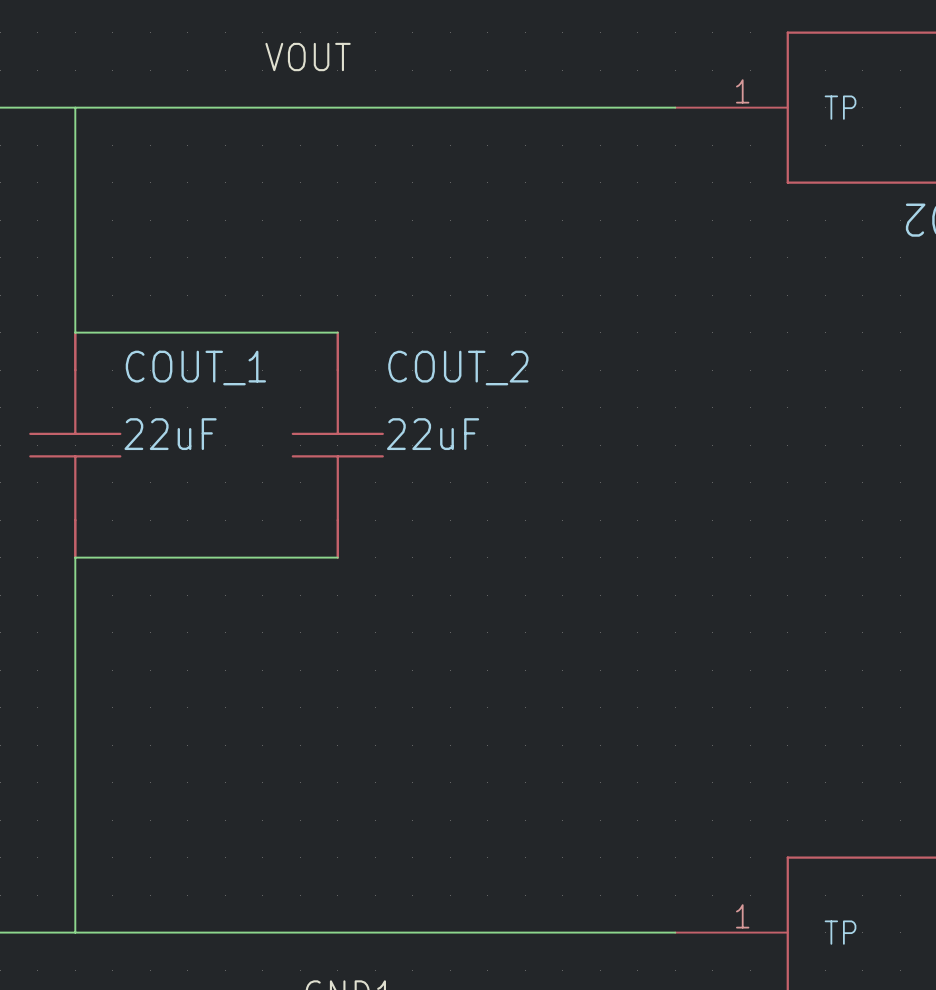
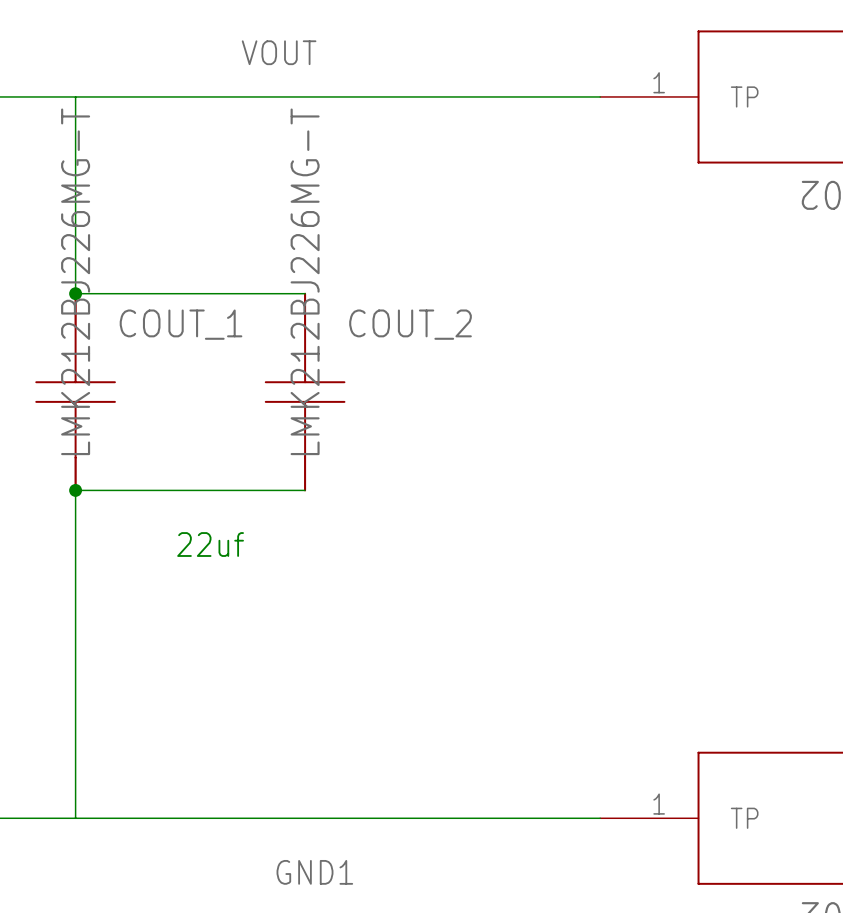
junction: none -> (75, 293)
COUT_1 value: 22uF (170, 434) -> LMK212BJ226MG-T (75, 281)
COUT_2 value: 22uF (433, 434) -> LMK212BJ226MG-T (305, 281)
junction: none -> (75, 490)
text: none -> 22uf (210, 544)

